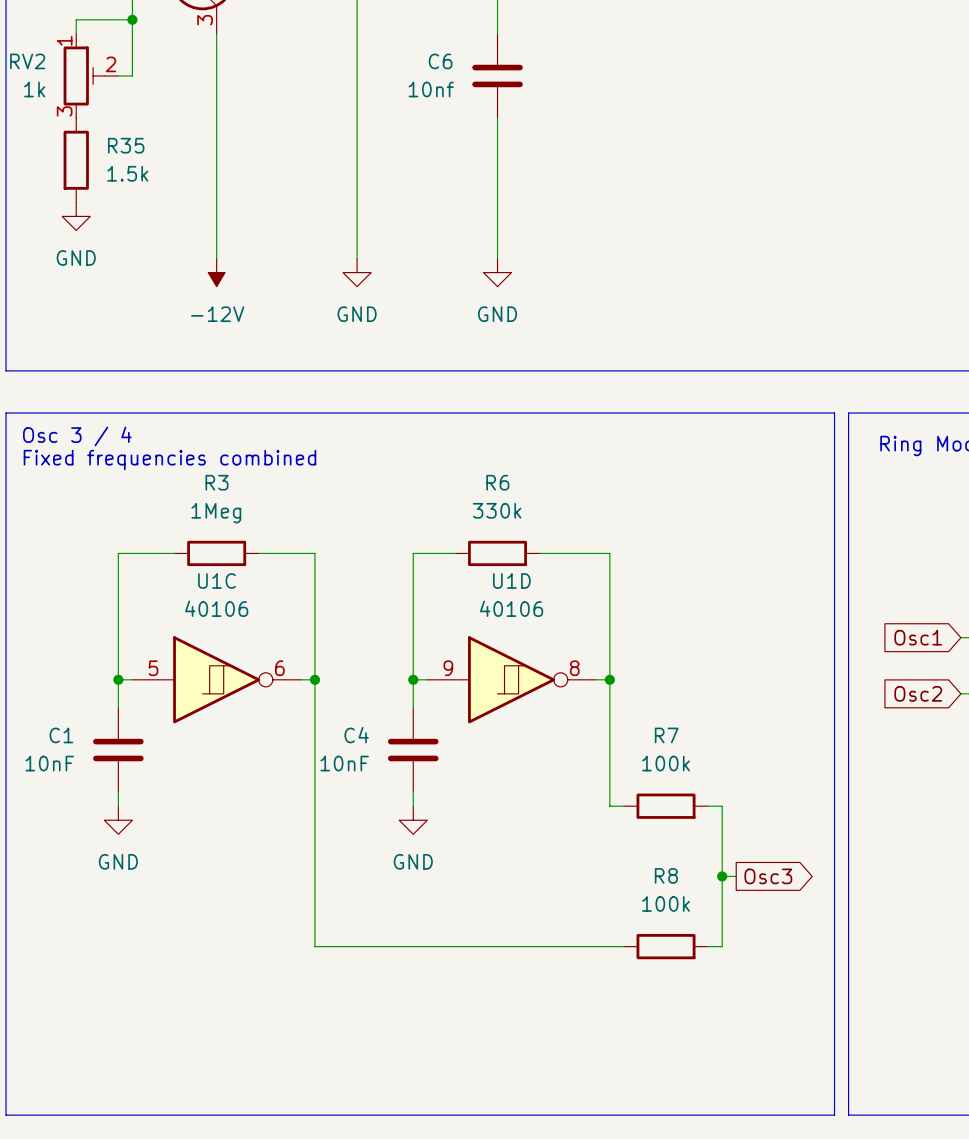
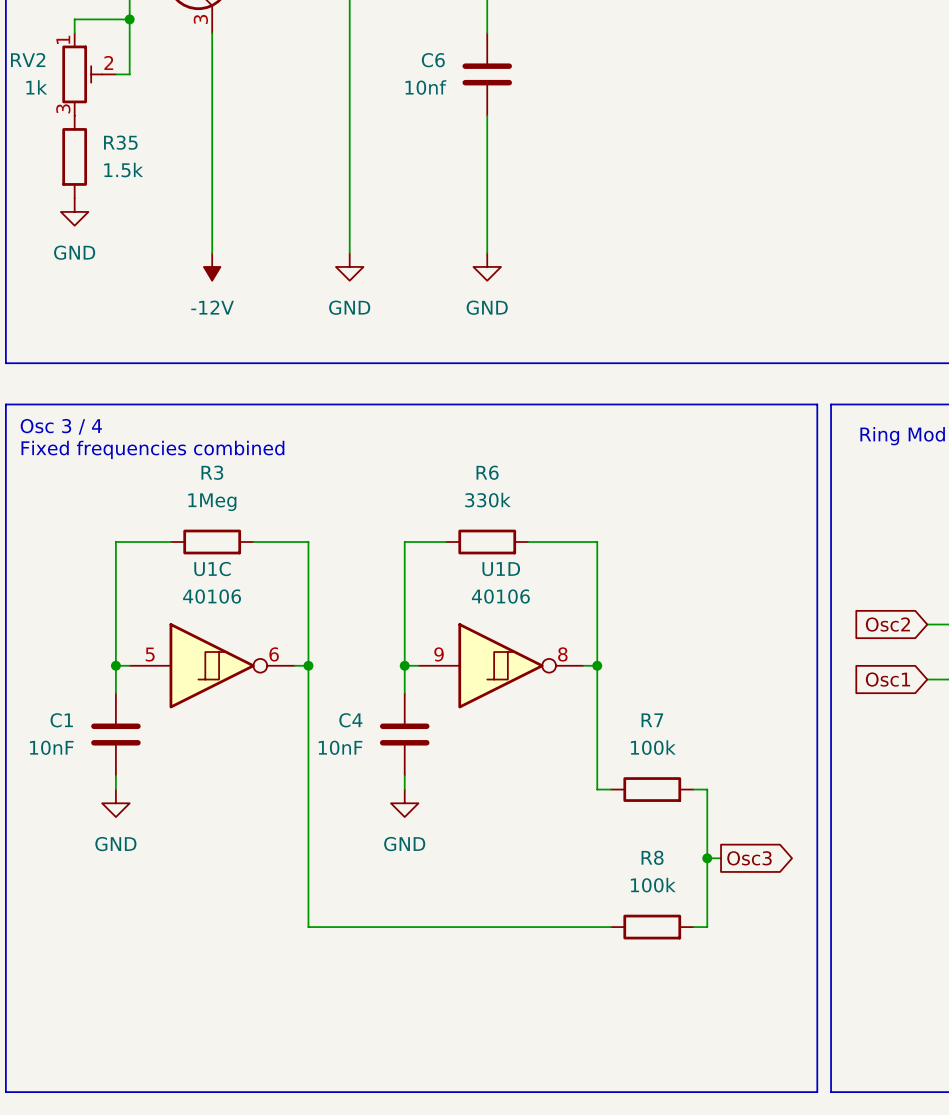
global label position: Osc1 (918, 637) -> Osc1 (887, 679)
wire: none -> (927, 624) (941, 624)
global label position: Osc2 (918, 693) -> Osc2 (887, 624)
wire: none -> (927, 679) (941, 679)

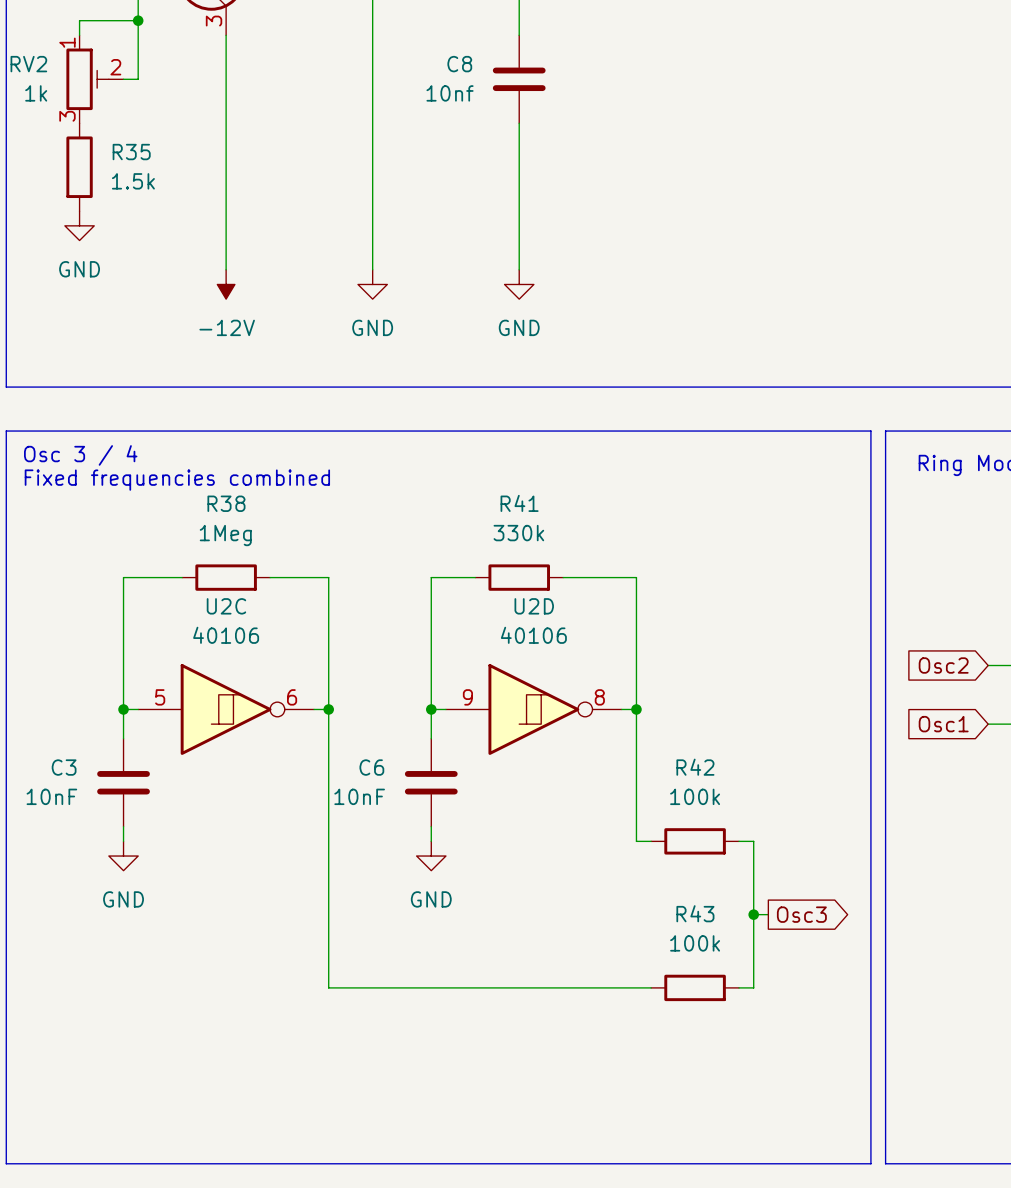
C6 name: C6 (433, 60) -> C8 (459, 64)
R3 name: R3 (212, 472) -> R38 (226, 503)
R6 name: R6 (487, 472) -> R41 (519, 503)
U1C name: U1C (212, 569) -> U2C (226, 606)
U1D name: U1D (501, 569) -> U2D (534, 606)
C1 name: C1 (61, 720) -> C3 (64, 767)
C4 name: C4 (350, 720) -> C6 (371, 767)
R7 name: R7 (652, 720) -> R42 (695, 767)
R8 name: R8 (652, 857) -> R43 (695, 913)

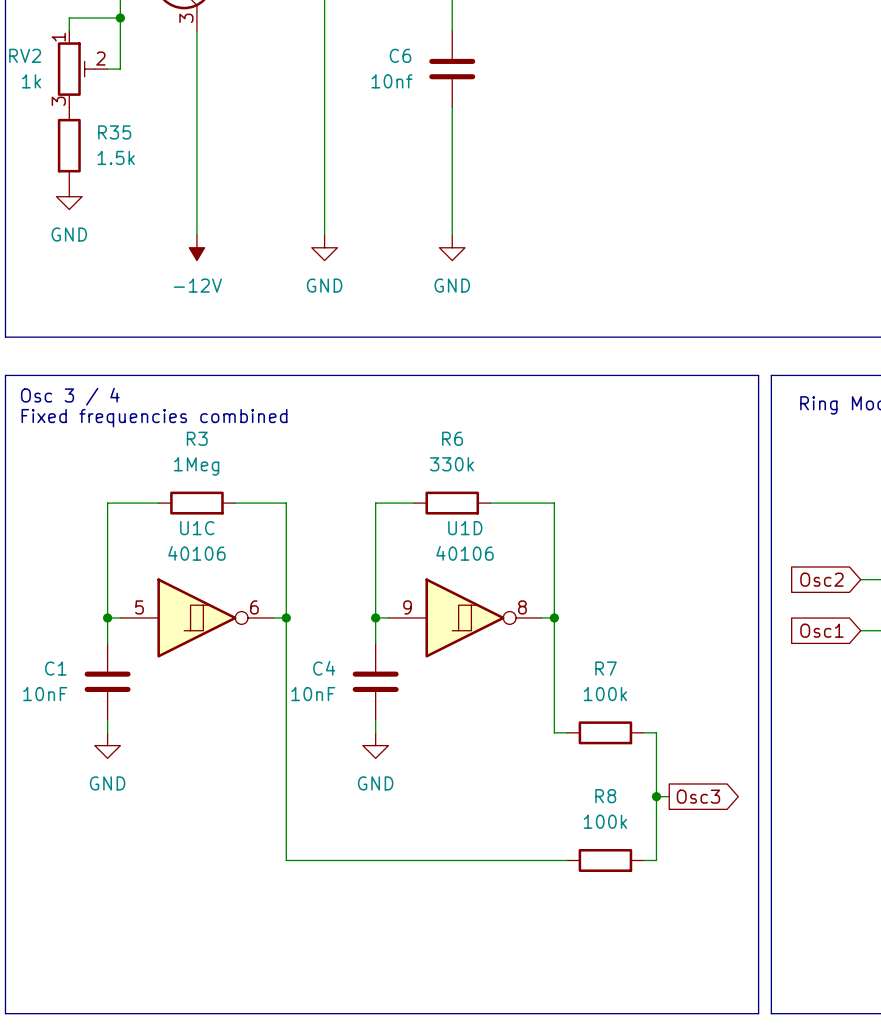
C8 name: C8 (459, 64) -> C6 (400, 55)
R38 name: R38 (226, 503) -> R3 (197, 438)
R41 name: R41 (519, 503) -> R6 (452, 438)
U2C name: U2C (226, 606) -> U1C (197, 528)
U2D name: U2D (534, 606) -> U1D (465, 528)
C3 name: C3 (64, 767) -> C1 (55, 668)
C6 name: C6 (371, 767) -> C4 (324, 668)
R42 name: R42 (695, 767) -> R7 (606, 668)
R43 name: R43 (695, 913) -> R8 (605, 796)

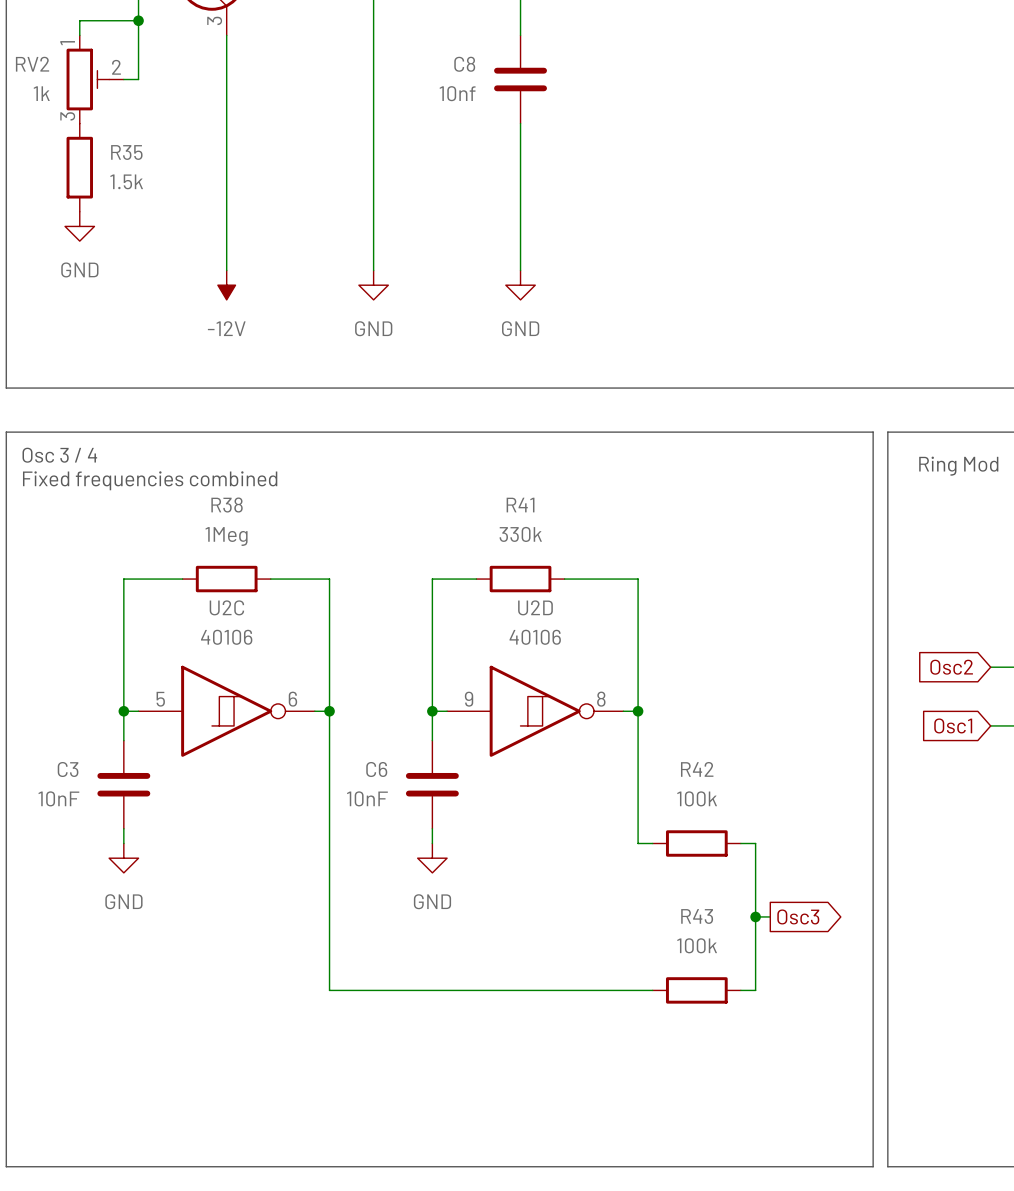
C6 name: C6 (400, 55) -> C8 (464, 64)
R3 name: R3 (197, 438) -> R38 (227, 505)
R6 name: R6 (452, 438) -> R41 (520, 505)
U1C name: U1C (197, 528) -> U2C (226, 607)
U1D name: U1D (465, 528) -> U2D (535, 607)
C1 name: C1 (55, 668) -> C3 (68, 769)
C4 name: C4 (324, 668) -> C6 (376, 769)
R7 name: R7 (606, 668) -> R42 (697, 769)
R8 name: R8 (605, 796) -> R43 (697, 916)

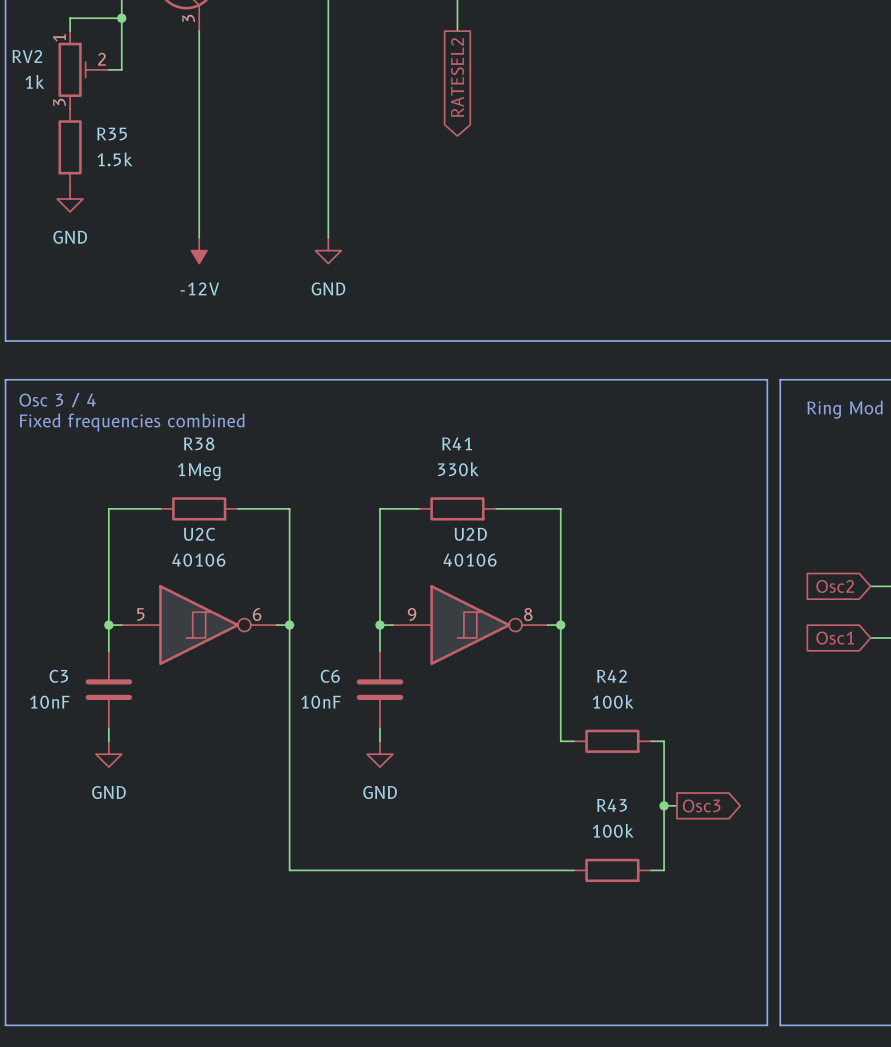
C8: 10nf (520, 79) -> none
global label: none -> RATESEL2 (457, 77)
wire: (520, 123) (520, 270) -> none
power symbol: GND (520, 285) -> none

